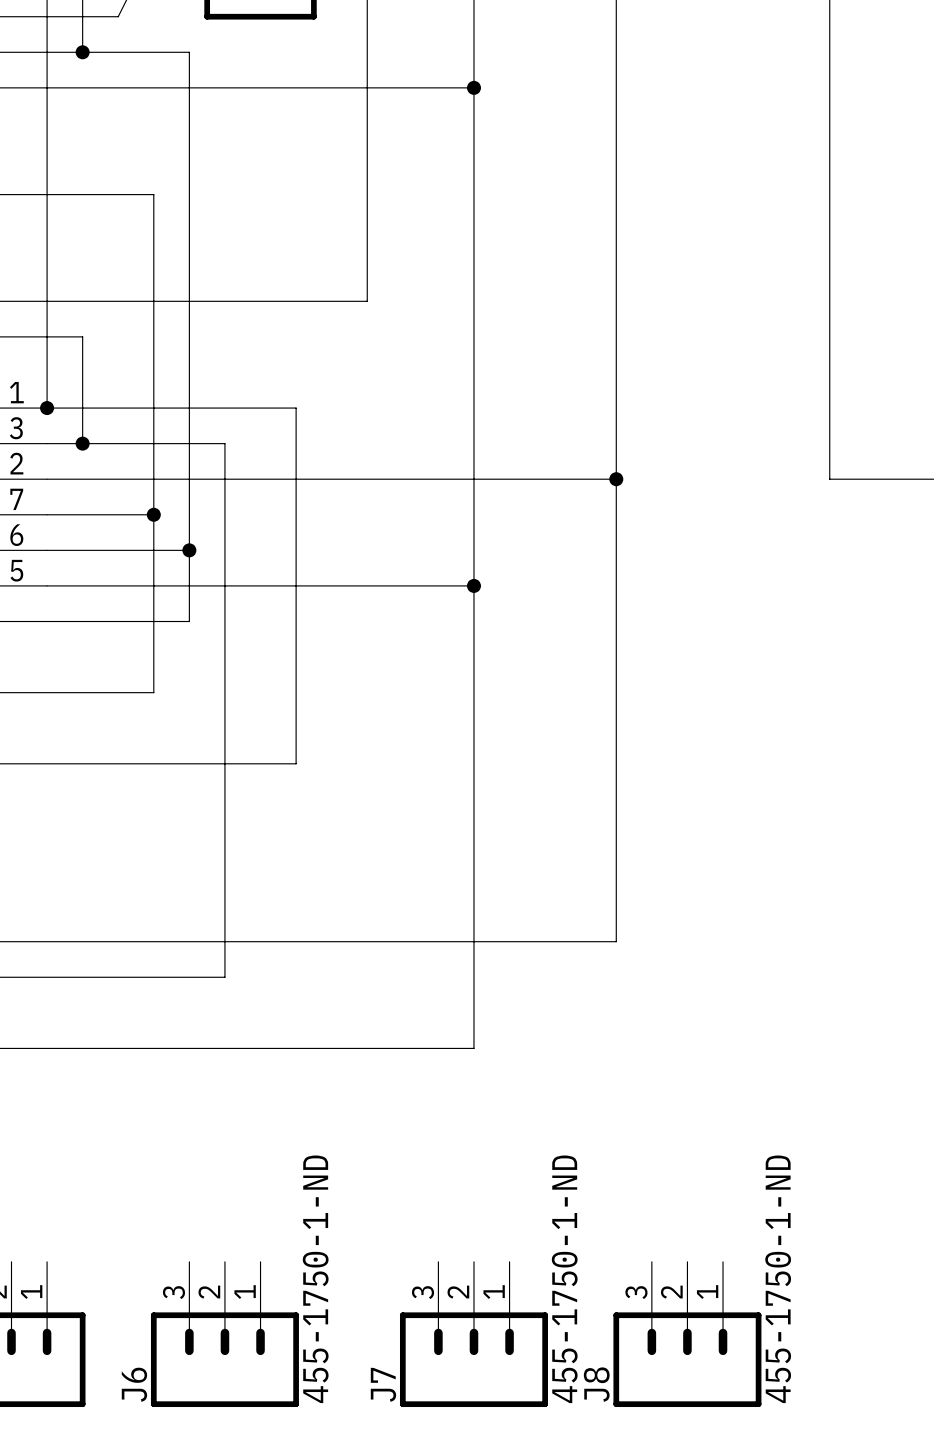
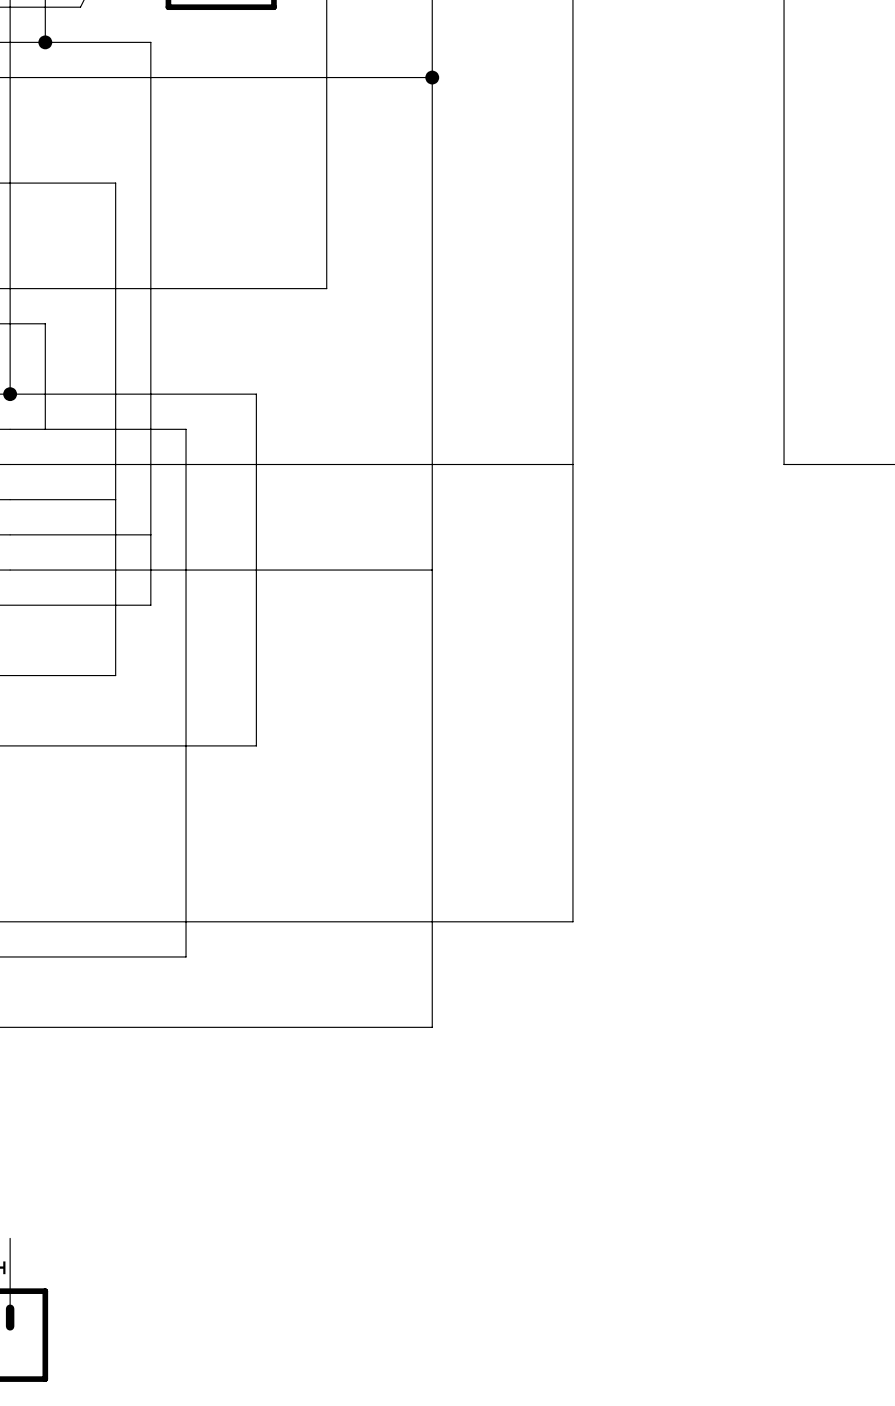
junction: (82, 443) -> none
junction: (616, 479) -> none
junction: (153, 514) -> none
junction: (189, 550) -> none
junction: (473, 585) -> none
J6: 455-1750-1-ND (224, 1334) -> none
J7: 455-1750-1-ND (473, 1334) -> none
J8: 455-1750-1-ND (687, 1334) -> none

